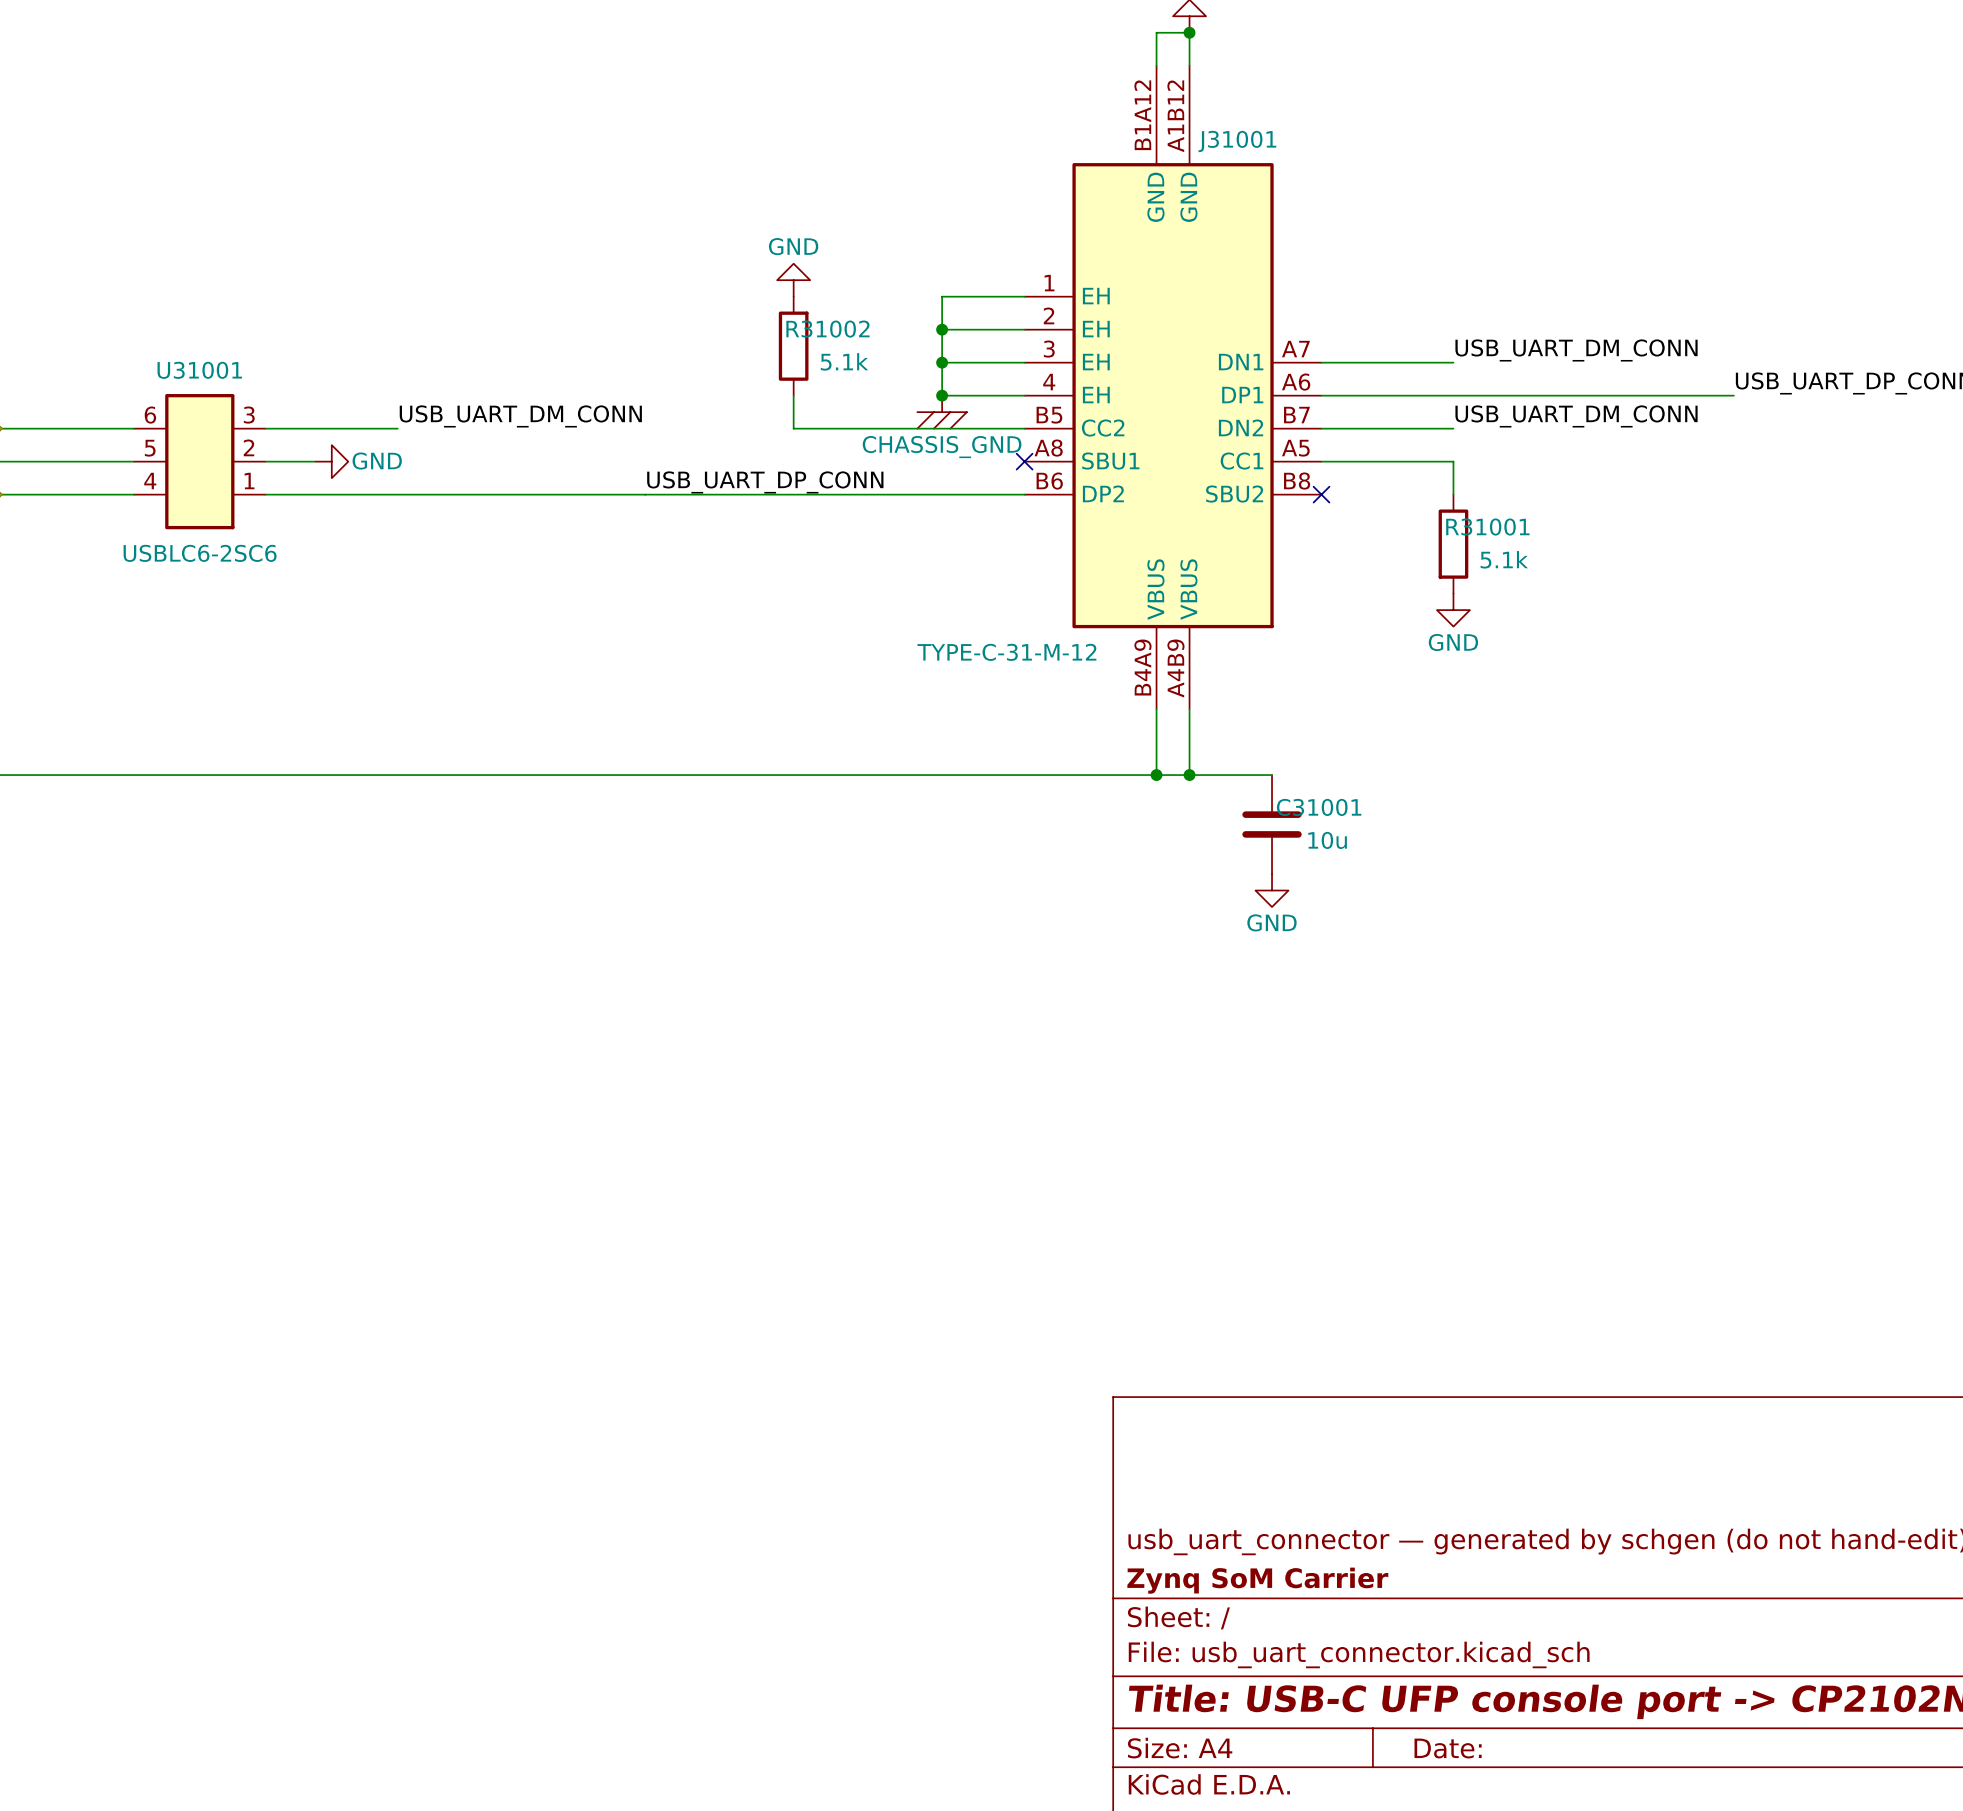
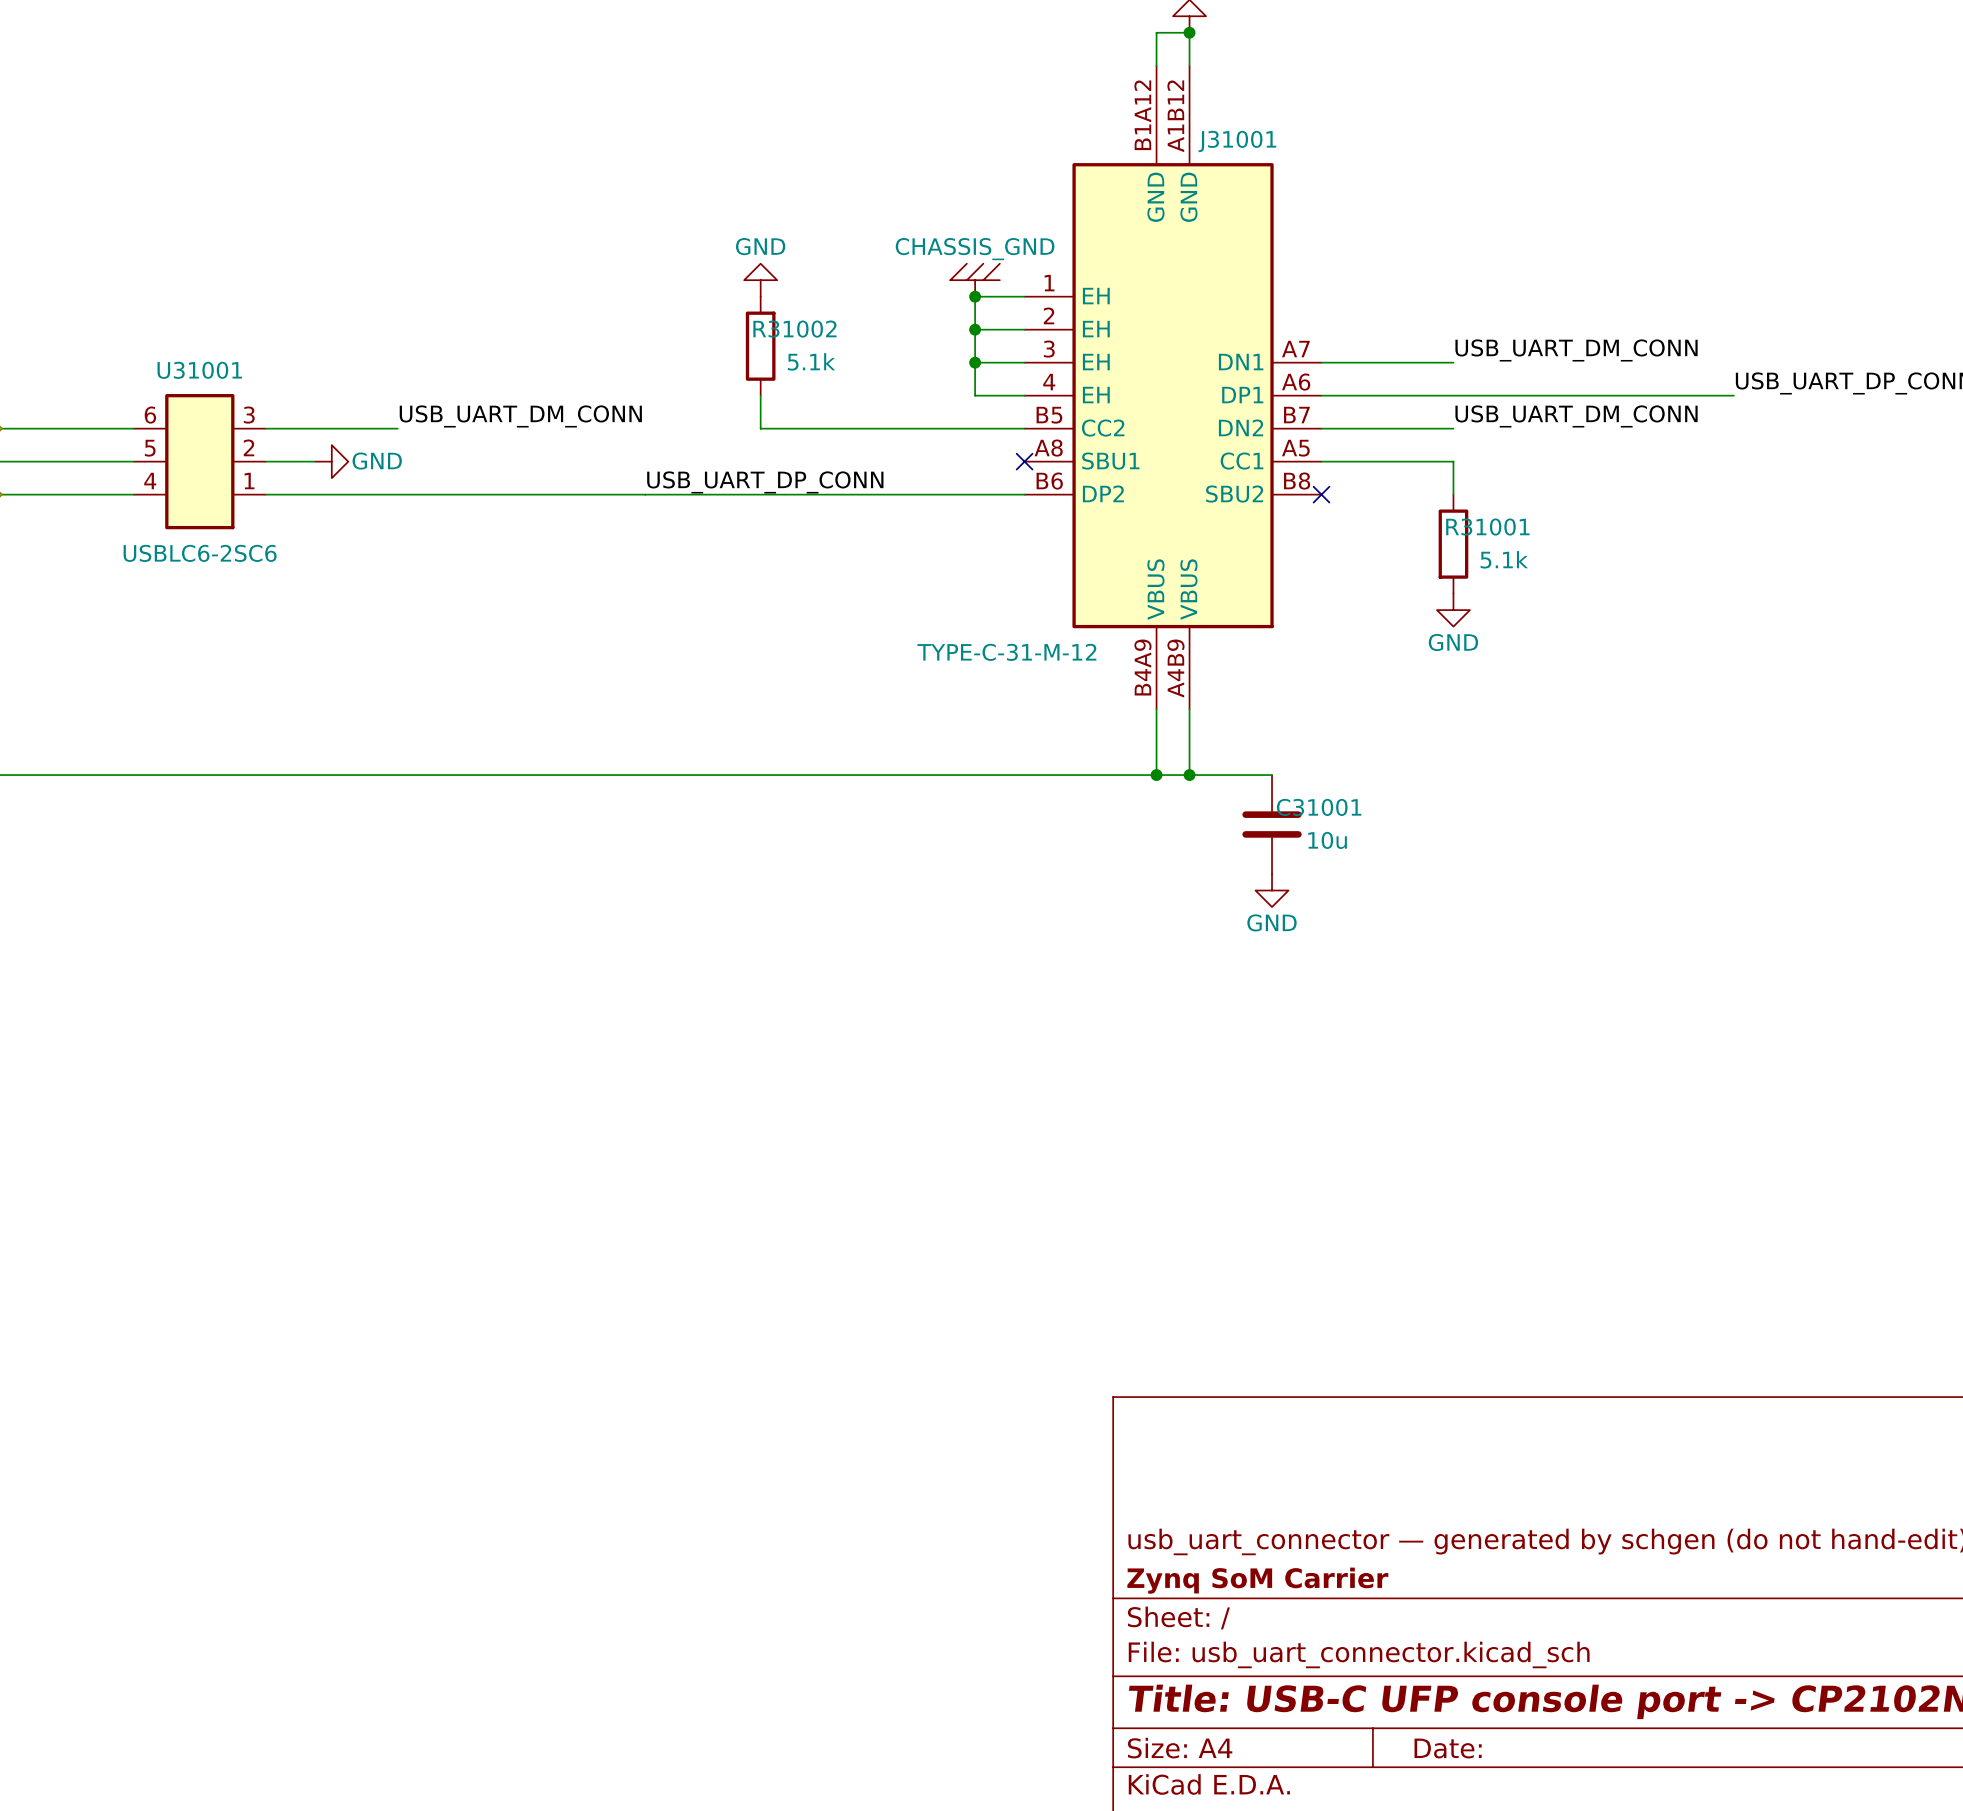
power symbol position: GND (793, 280) -> GND (760, 280)
wire: (975, 296) (942, 296) (942, 395) (975, 395) -> (975, 296) (975, 395)
junction: none -> (975, 296)
wire: (942, 329) (975, 329) -> none
junction: (942, 329) -> none
junction: none -> (975, 329)
R31002 position: (793, 346) -> (760, 346)
wire: (942, 362) (975, 362) -> none
junction: (942, 362) -> none
junction: none -> (975, 362)
wire: (793, 395) (793, 428) -> (760, 395) (760, 428) (793, 428)
junction: (942, 395) -> none
power symbol rotation: 0° (942, 412) -> 180° (975, 280)
power symbol position: CHASSIS_GND (942, 412) -> CHASSIS_GND (975, 280)

